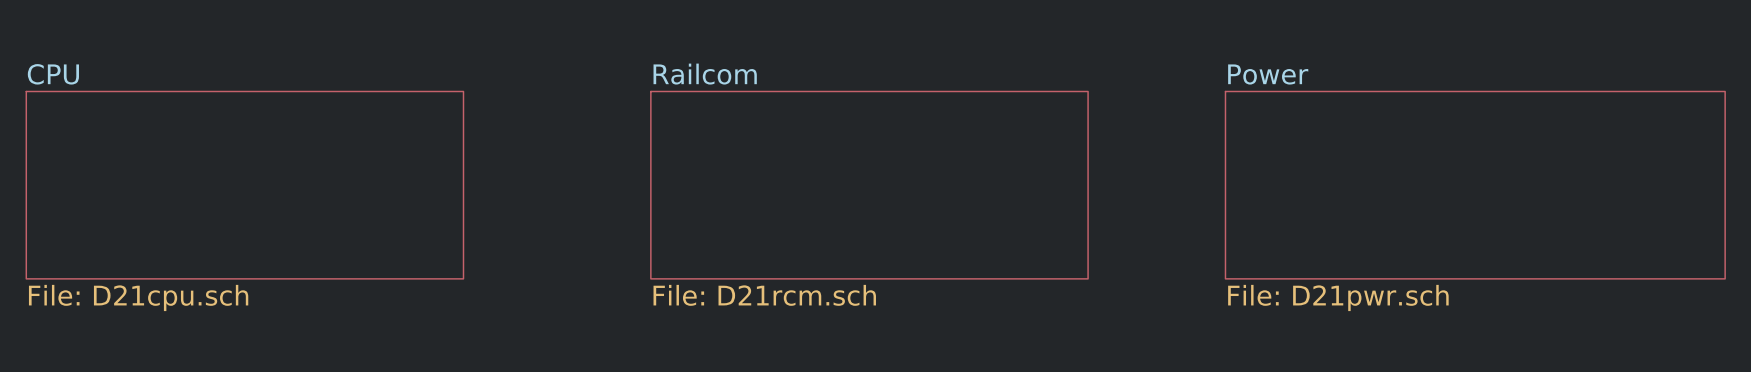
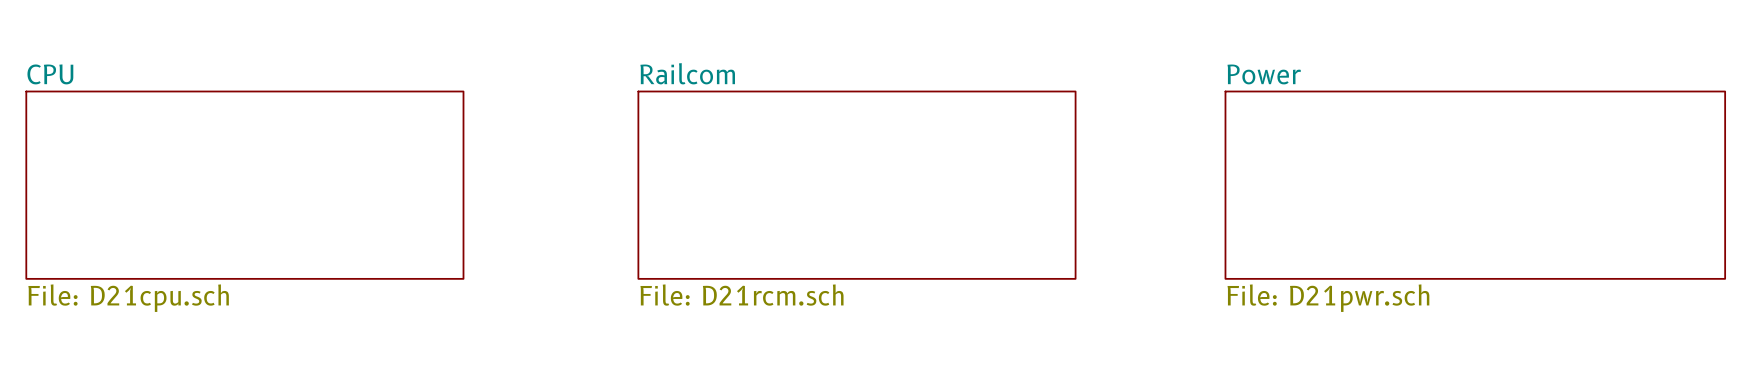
sheet Railcom position: (869, 185) -> (856, 185)

